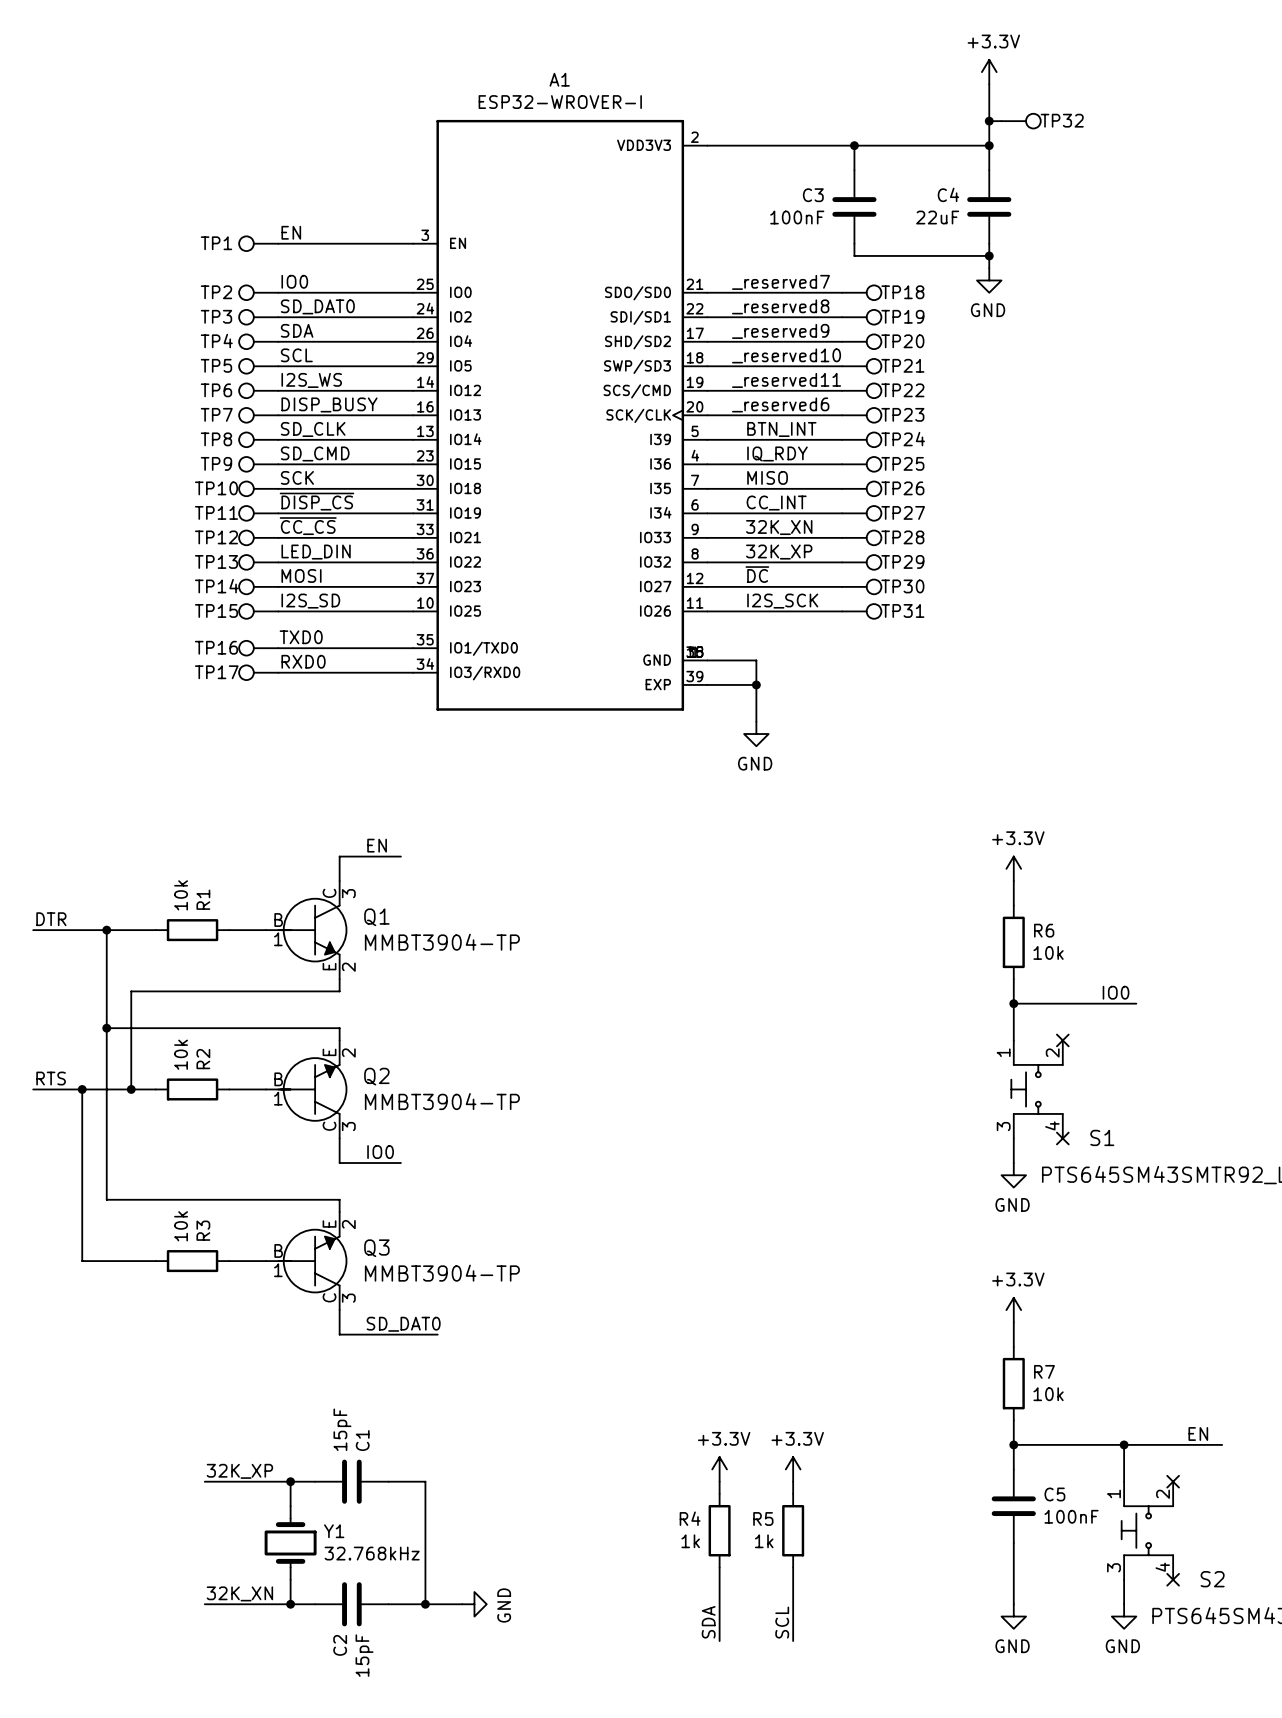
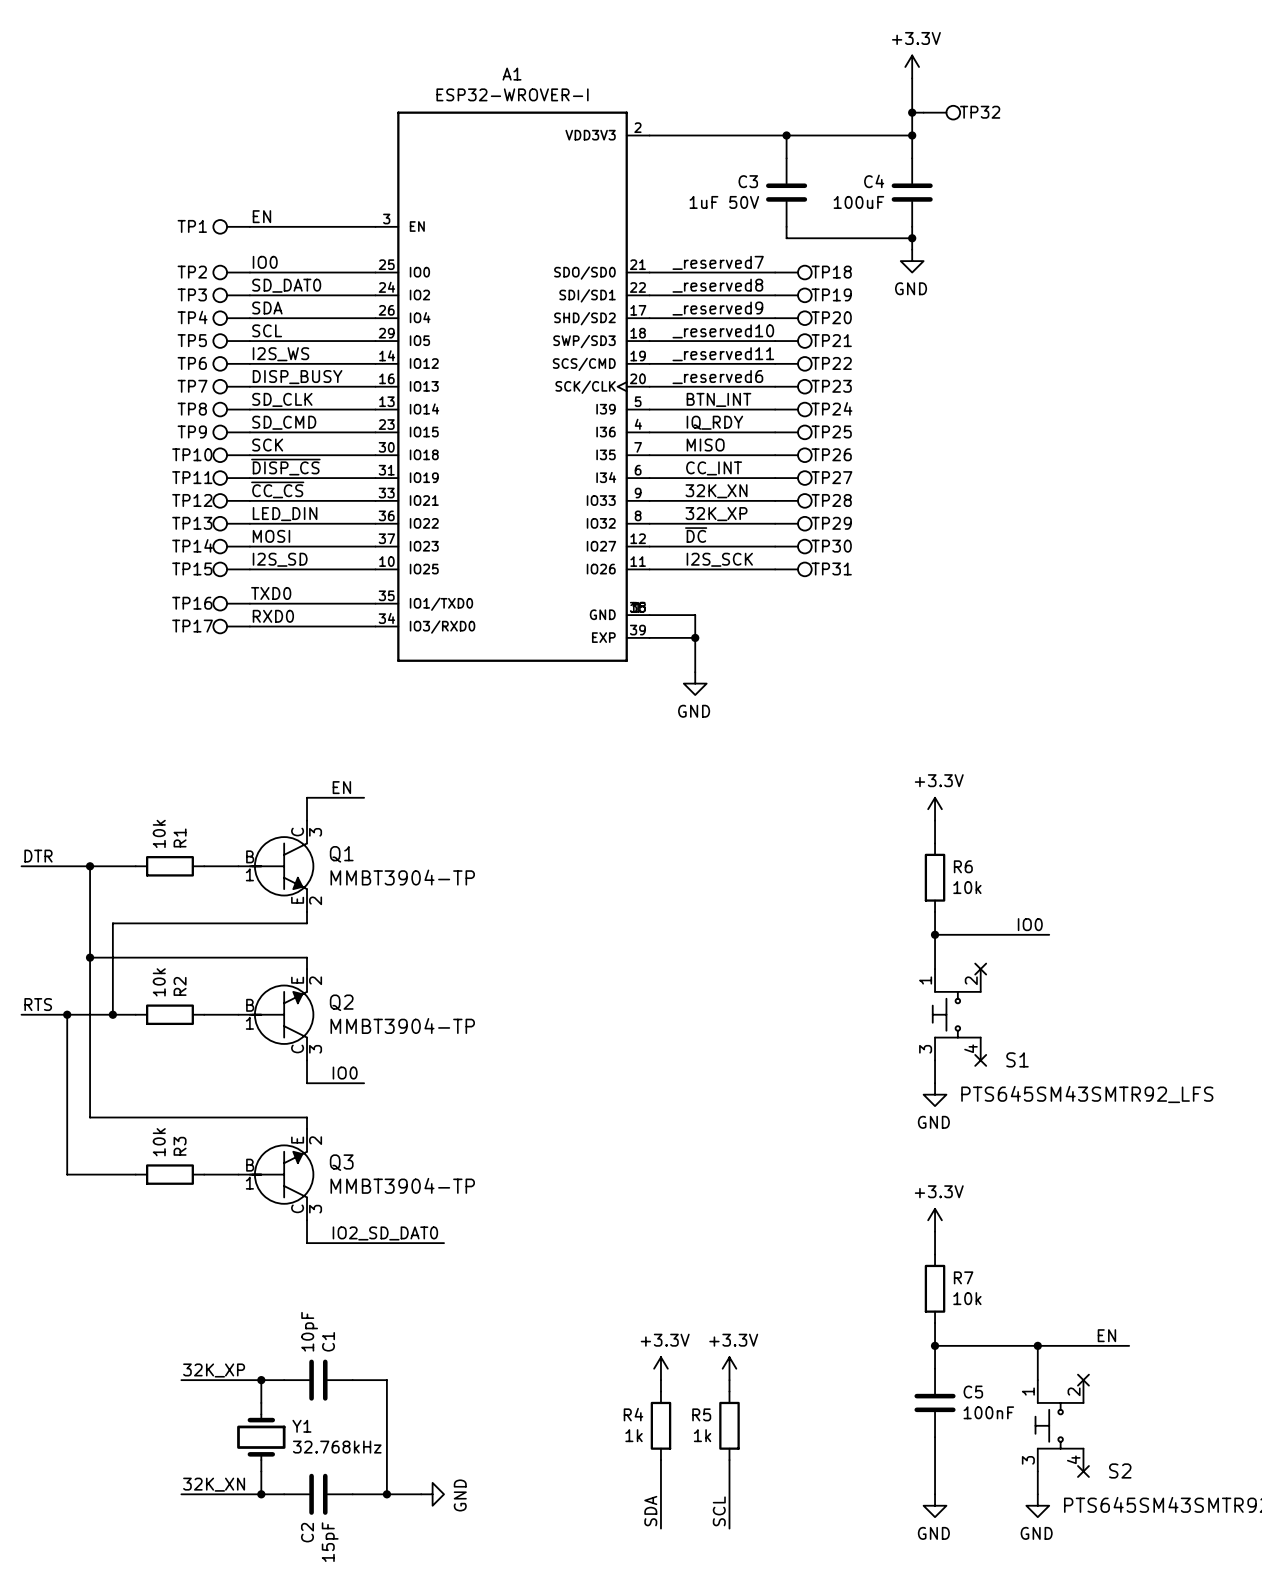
C3 value: 100nF (797, 217) -> 1uF 50V (724, 202)
C4 value: 22uF (937, 217) -> 100uF (858, 202)
label: SD_DAT0 (403, 1324) -> IO2_SD_DAT0 (385, 1233)
wire: none -> (398, 1243) (444, 1243)
C1 value: 15pF (342, 1429) -> 10pF (309, 1331)

